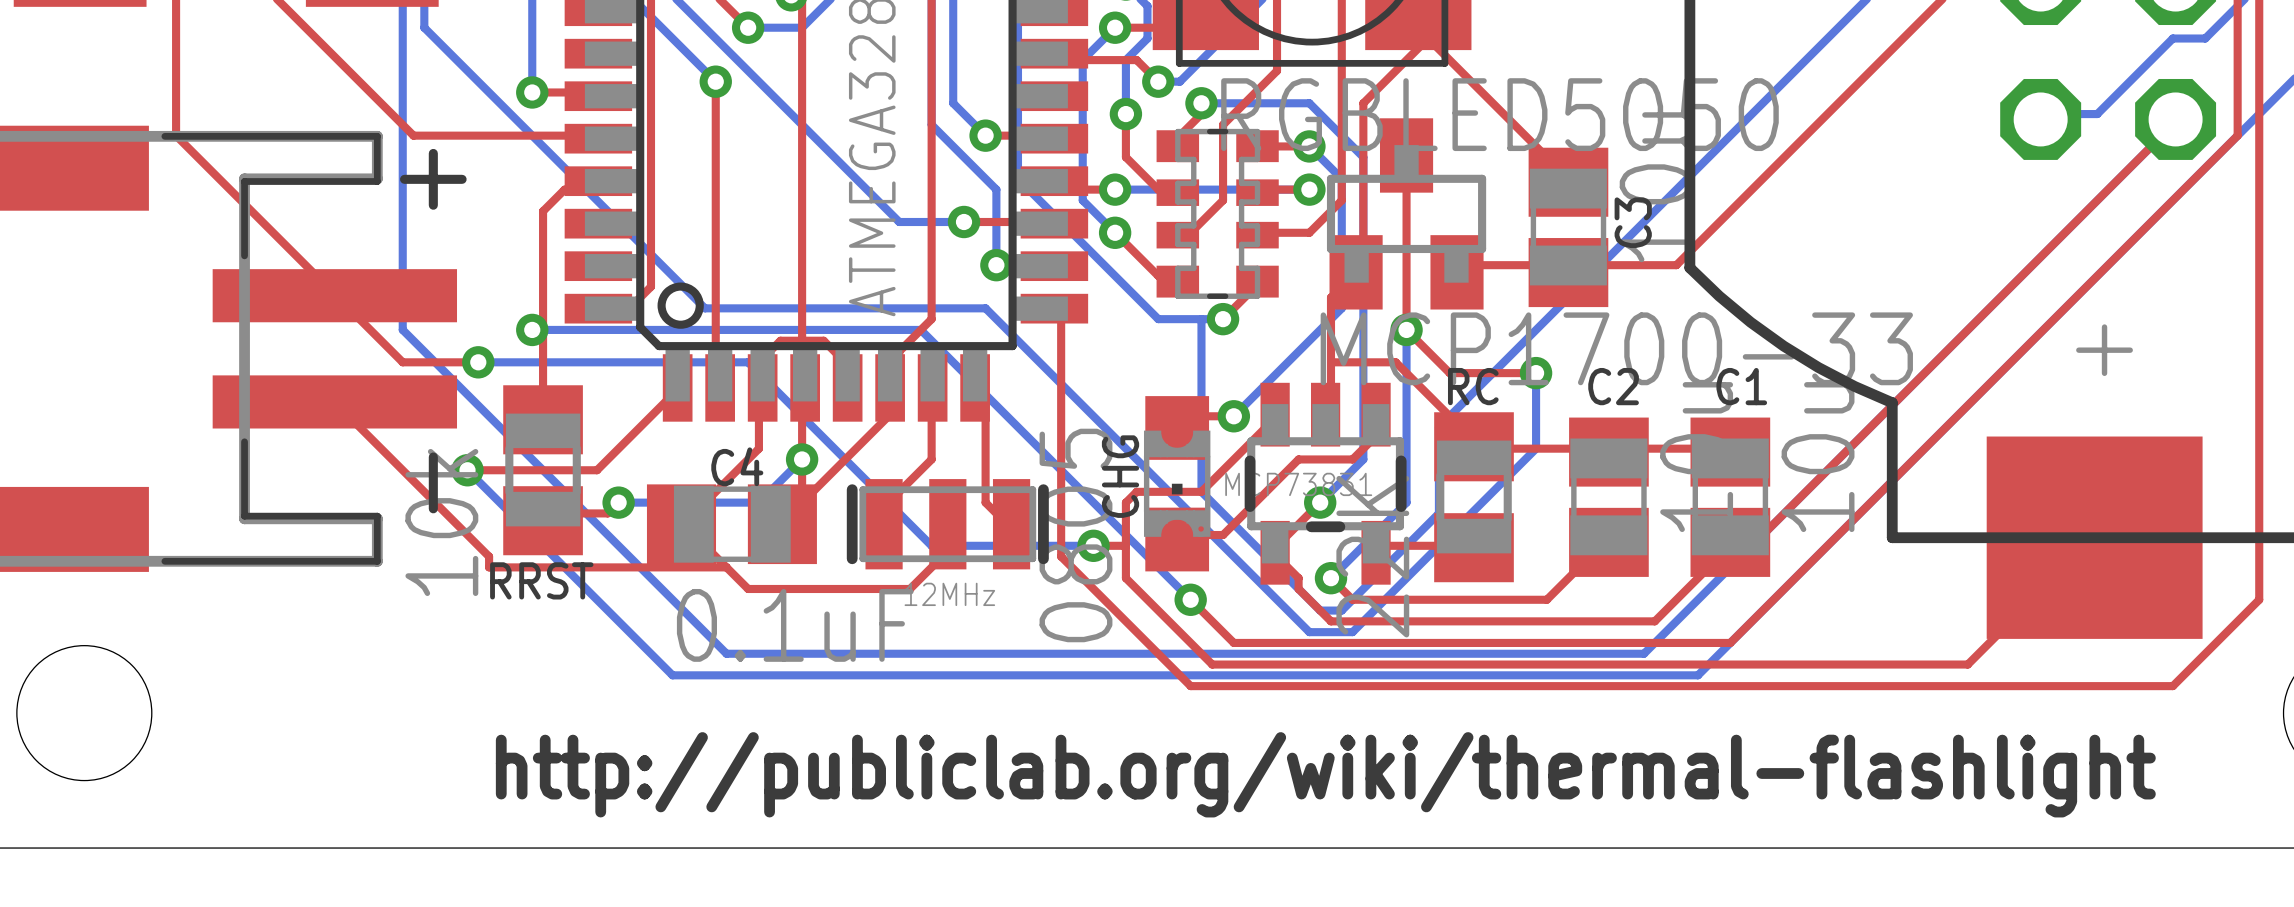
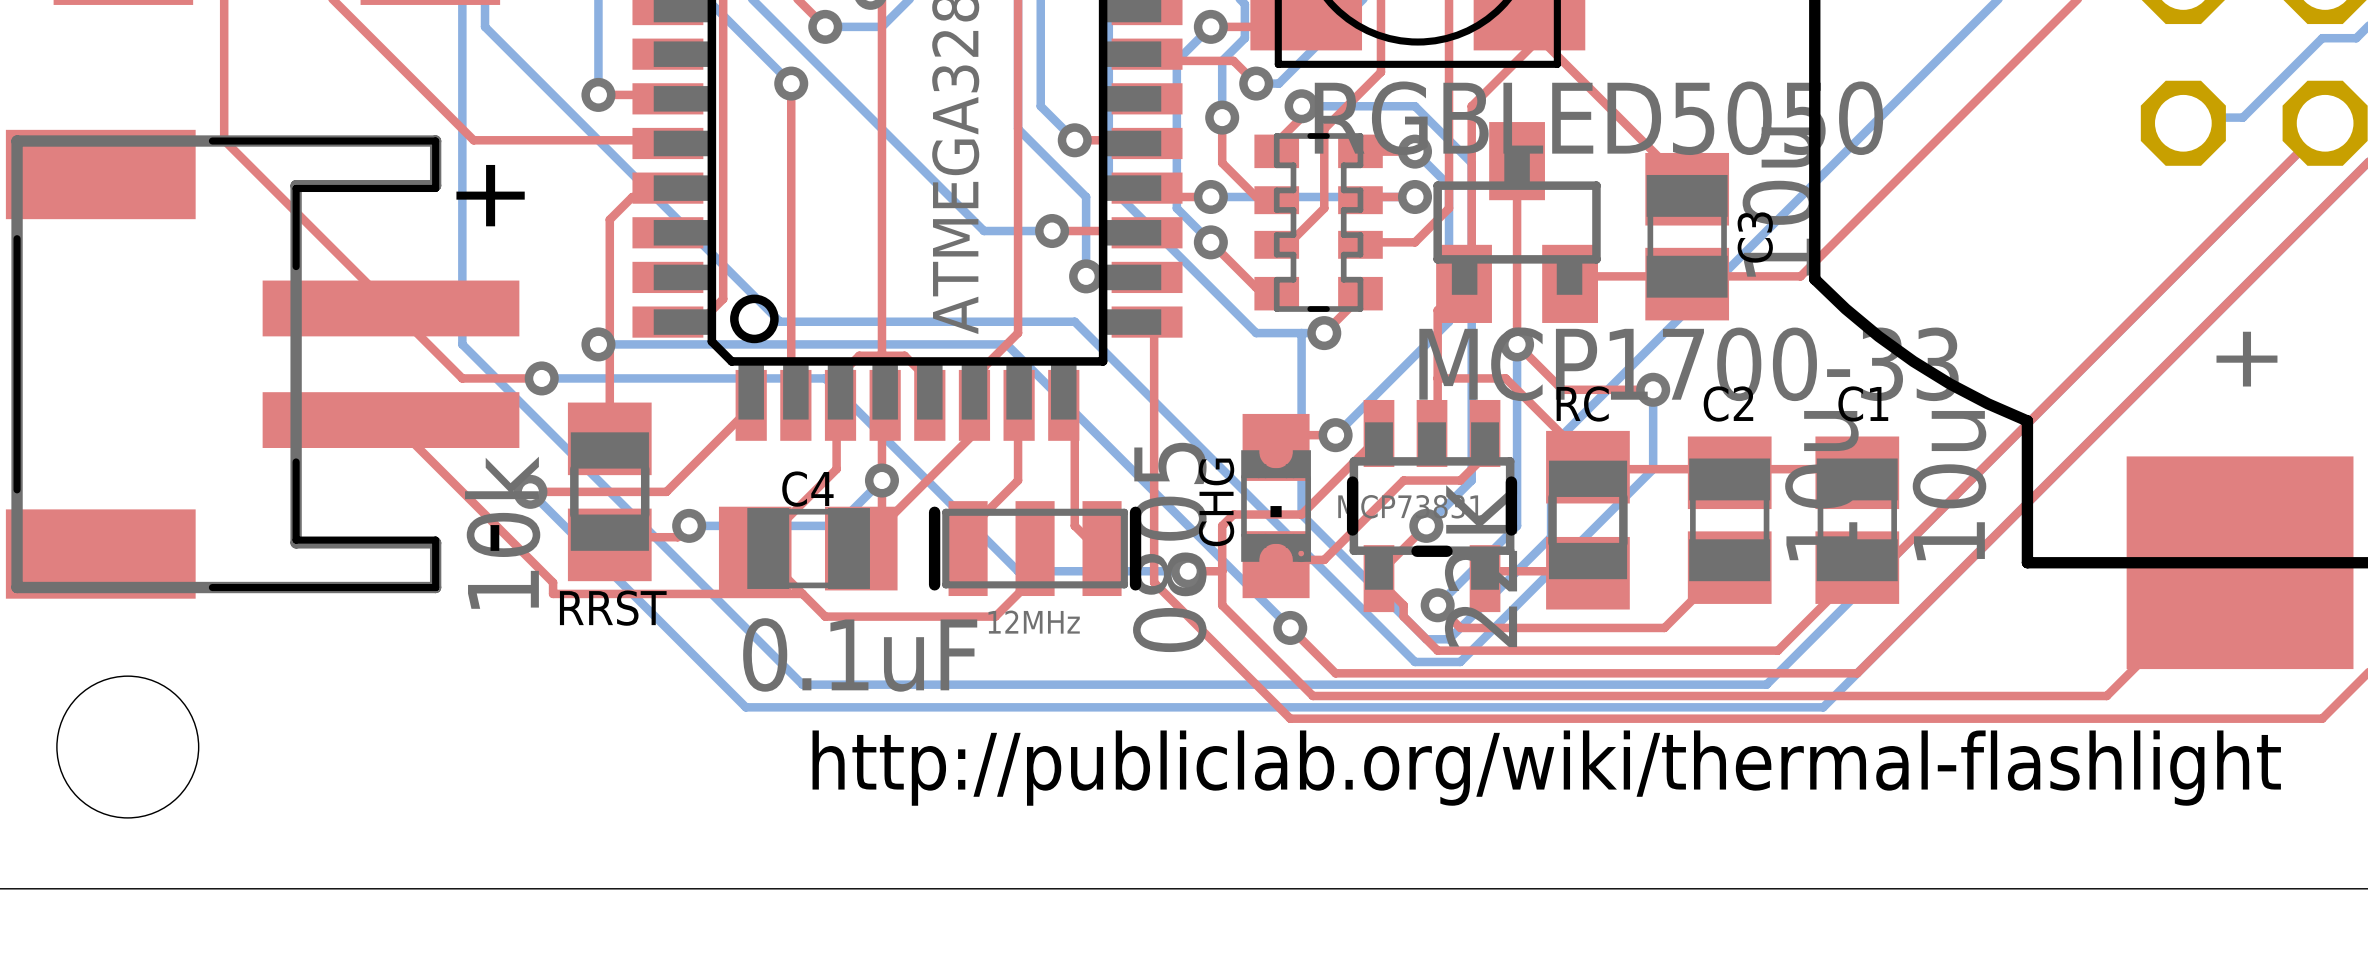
text position: http://publiclab.org/wiki/thermal-flashlight (1325, 774) -> http://publiclab.org/wiki/thermal-flashlight (1546, 768)

